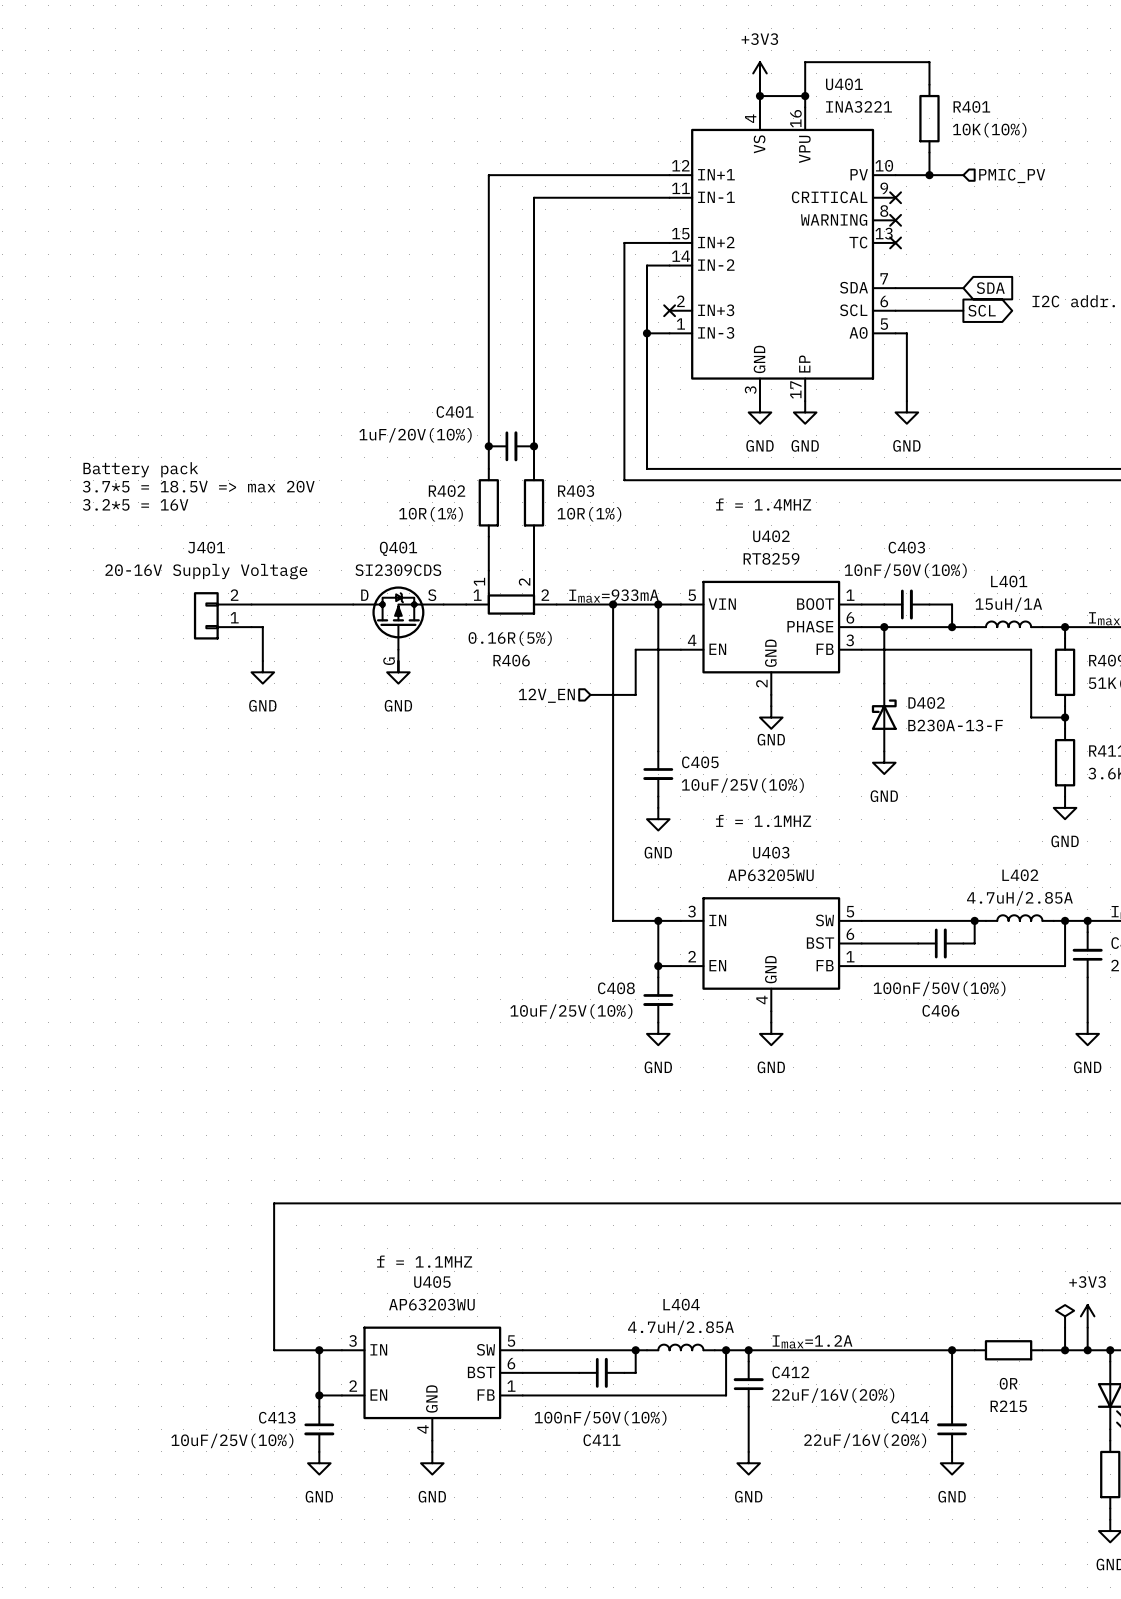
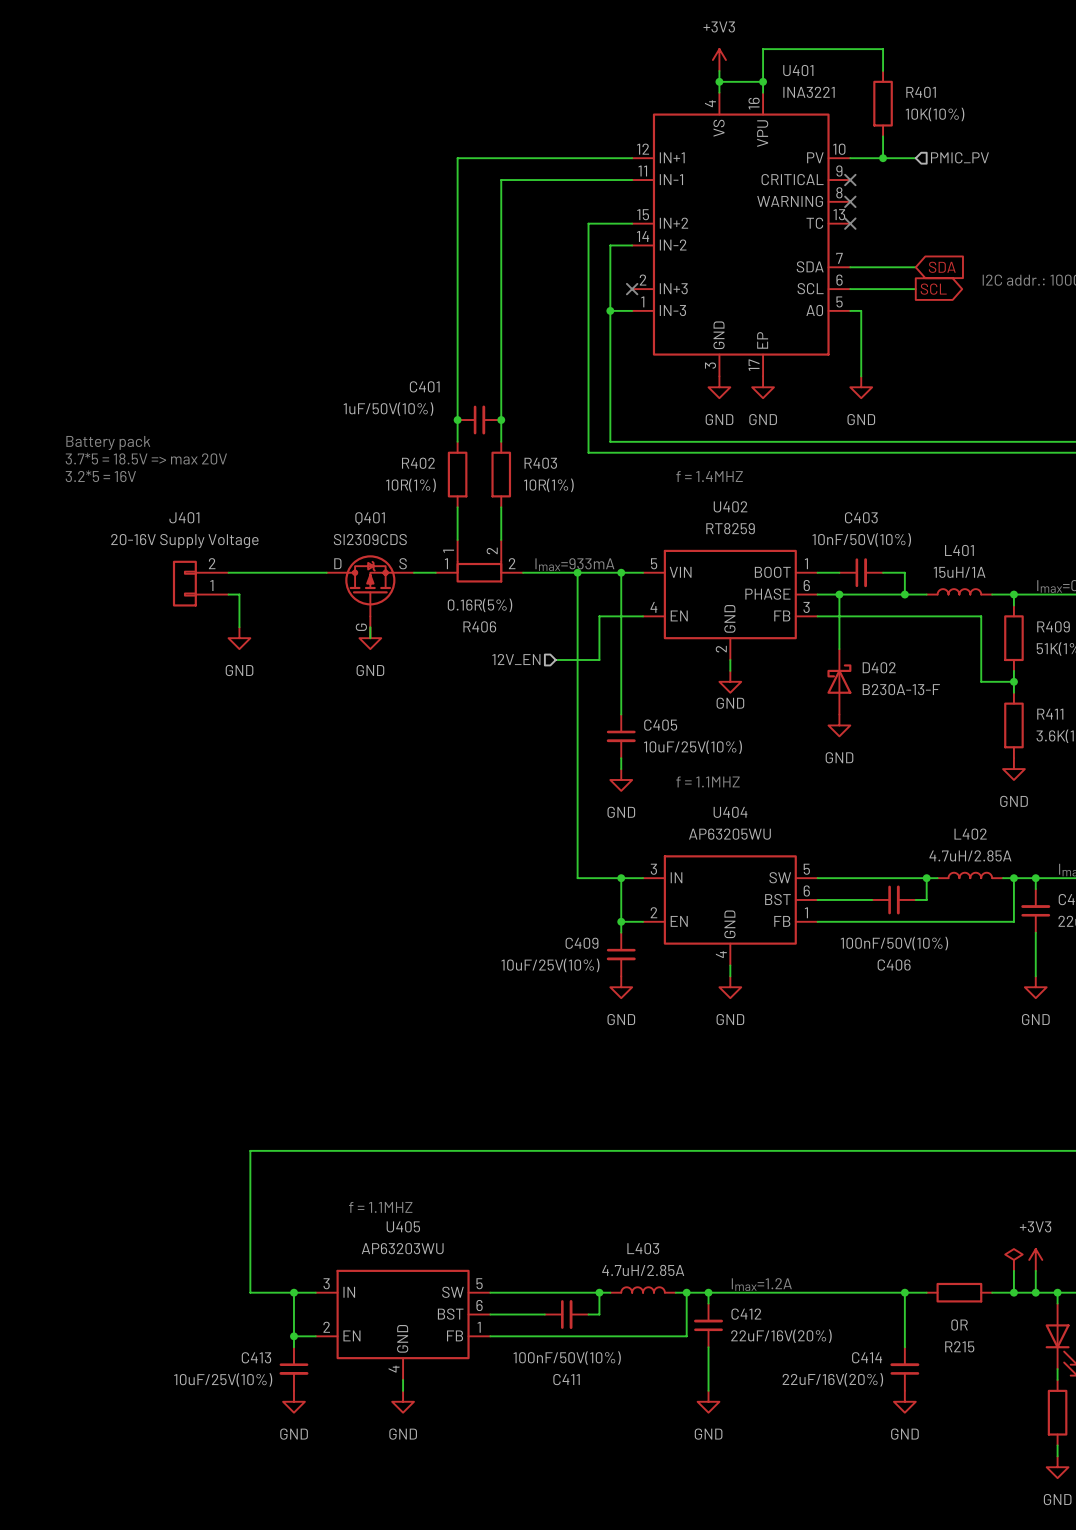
C401 value: 1uF/20V(10%) (415, 435) -> 1uF/50V(10%) (388, 409)
U403 name: U403 (771, 852) -> U404 (730, 812)
C408 name: C408 (616, 988) -> C409 (582, 943)
L404 name: L404 (681, 1304) -> L403 (643, 1248)

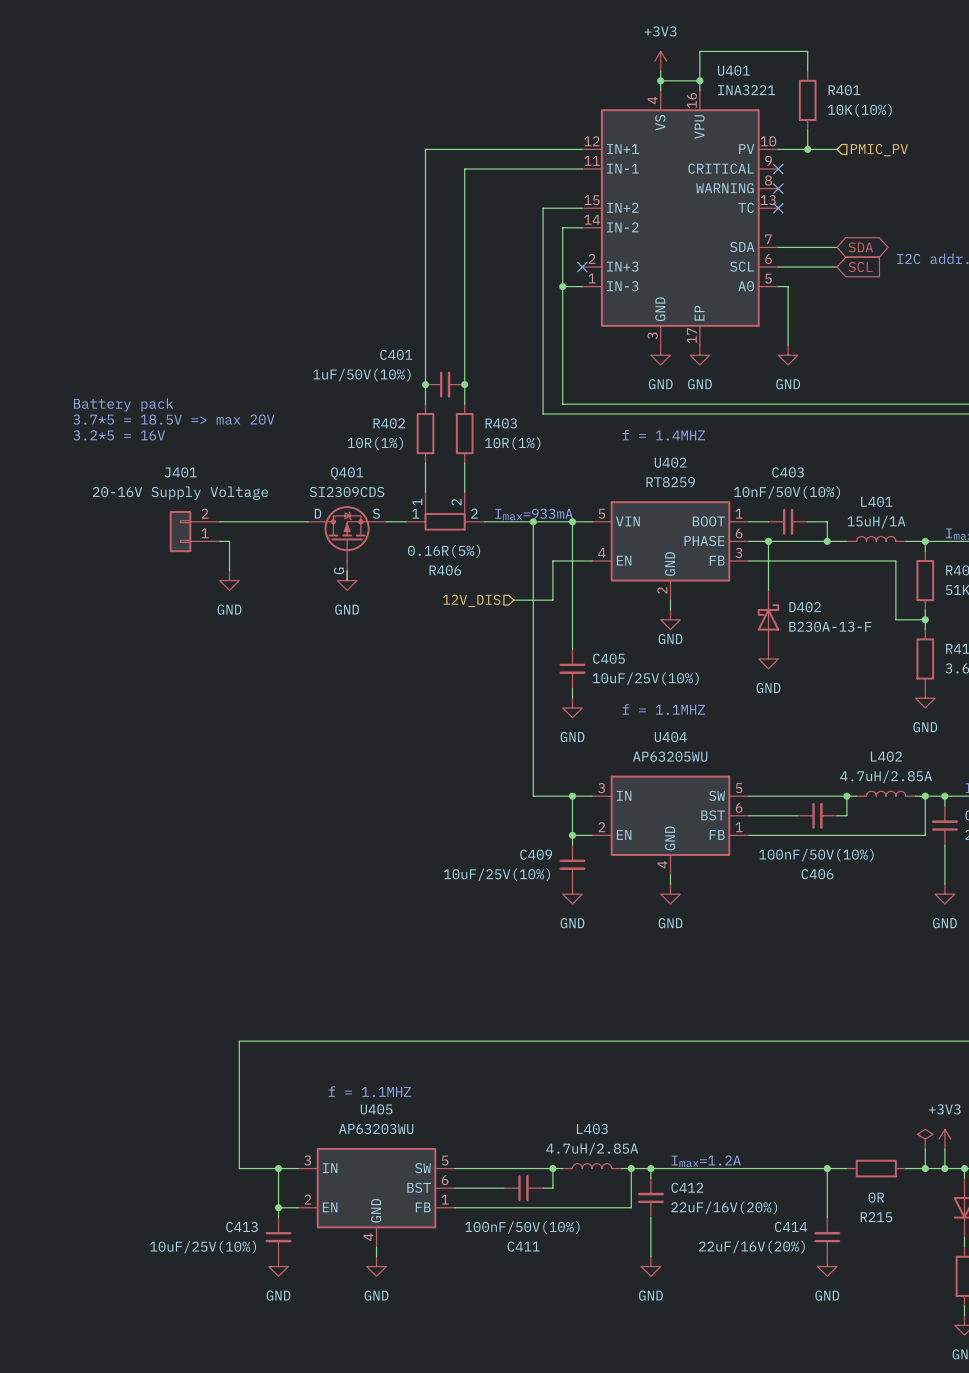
global label shape: input (942, 267) -> bidirectional (860, 247)
global label shape: output (933, 289) -> input (860, 267)
hierarchical label: 12V_EN (516, 659) -> 12V_DIS (471, 600)

